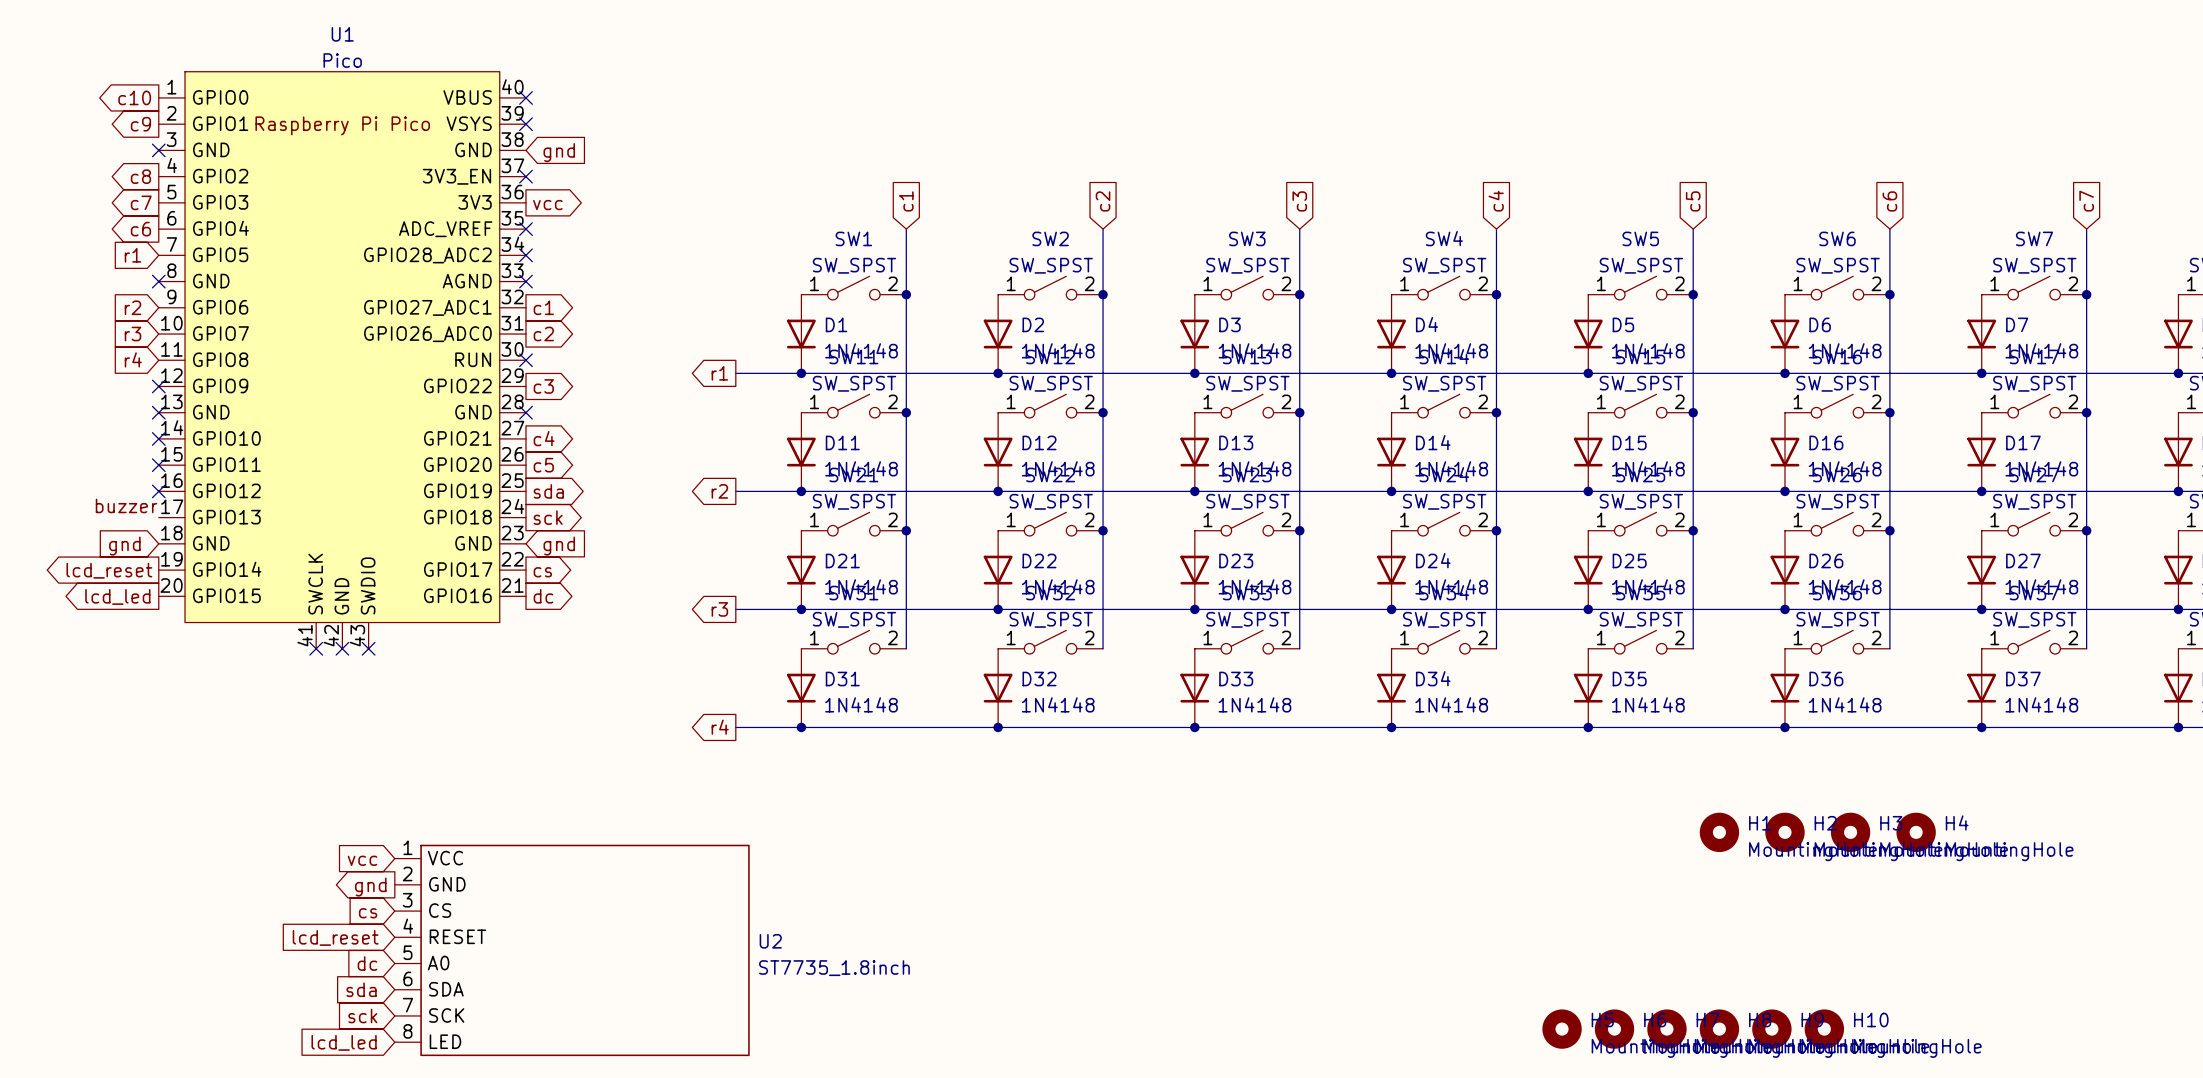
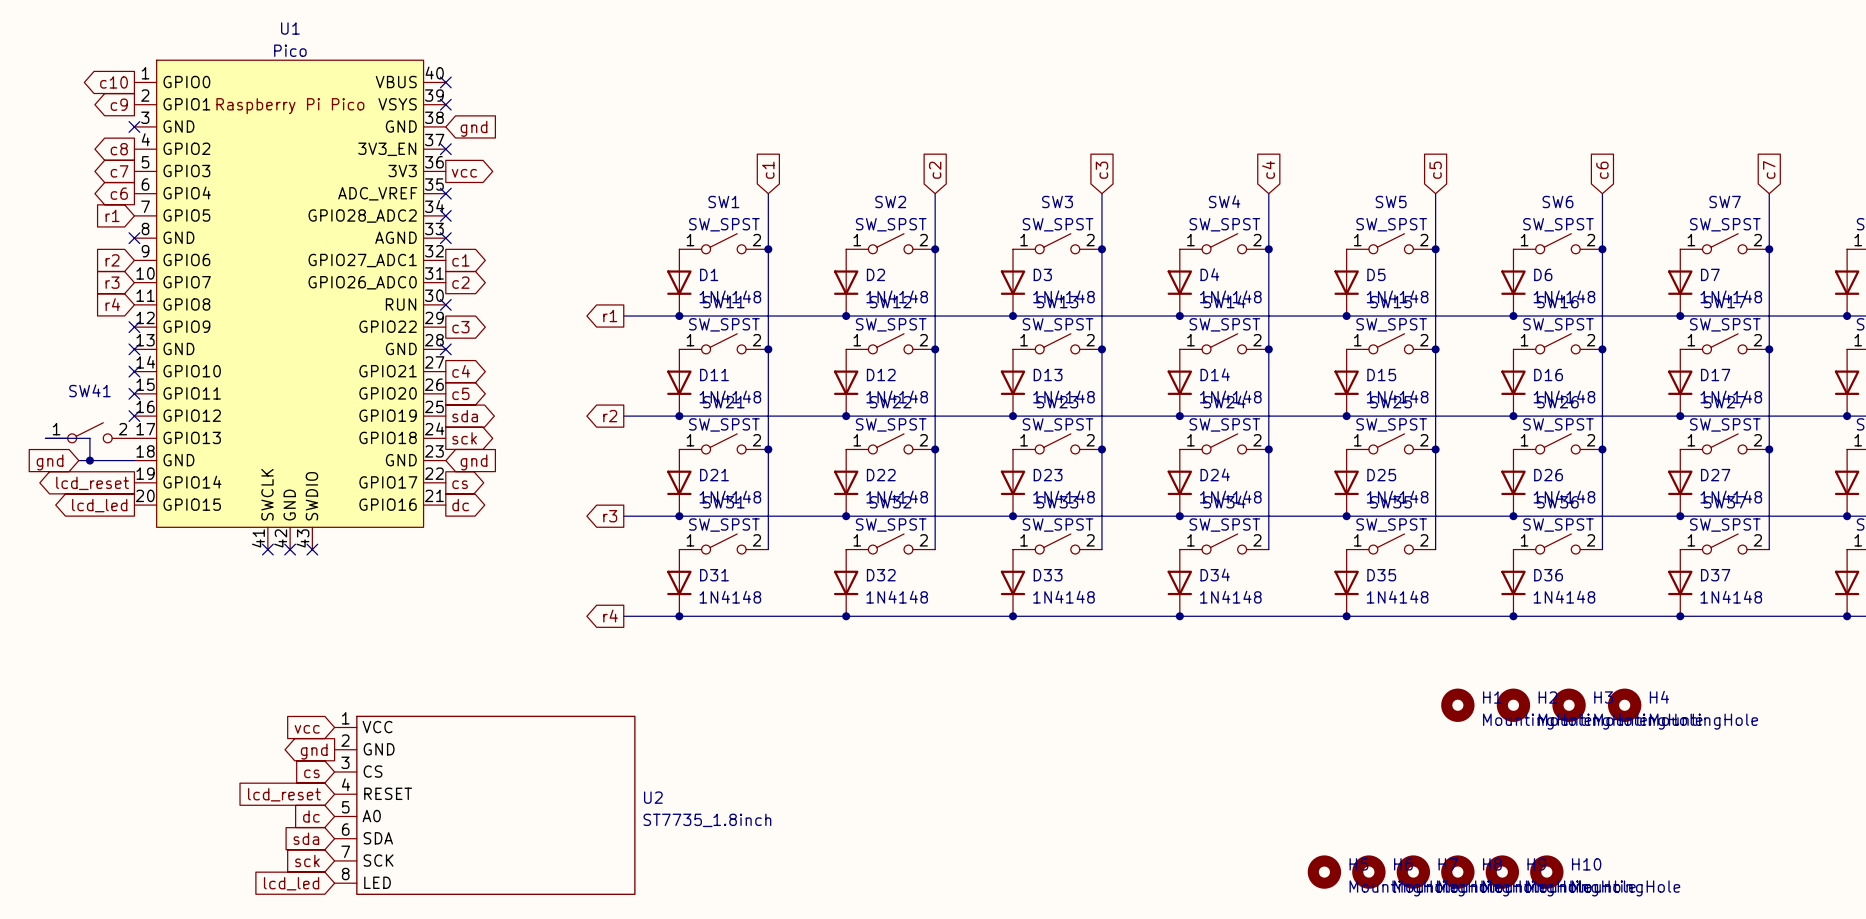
label: buzzer (126, 505) -> none
SW41: none -> (89, 432)
wire: none -> (45, 438) (89, 438) (89, 460)
wire: none -> (78, 460) (134, 460)
junction: none -> (89, 460)
global label position: gnd (124, 546) -> gnd (50, 462)

